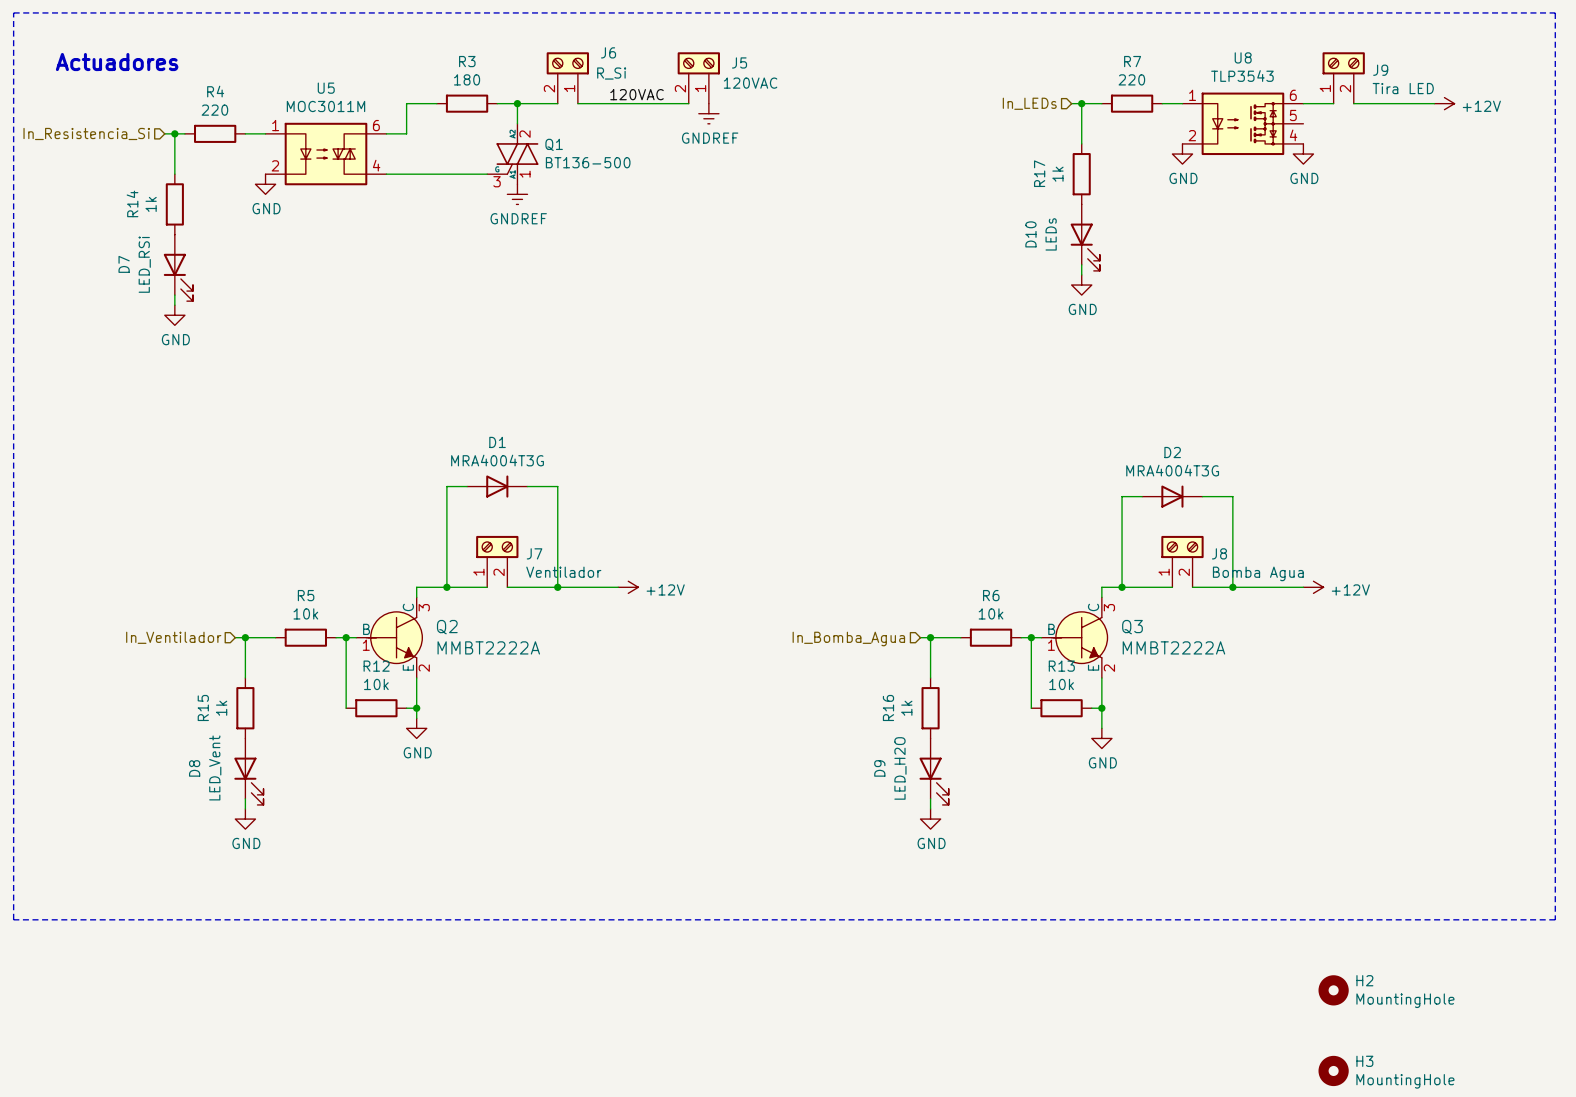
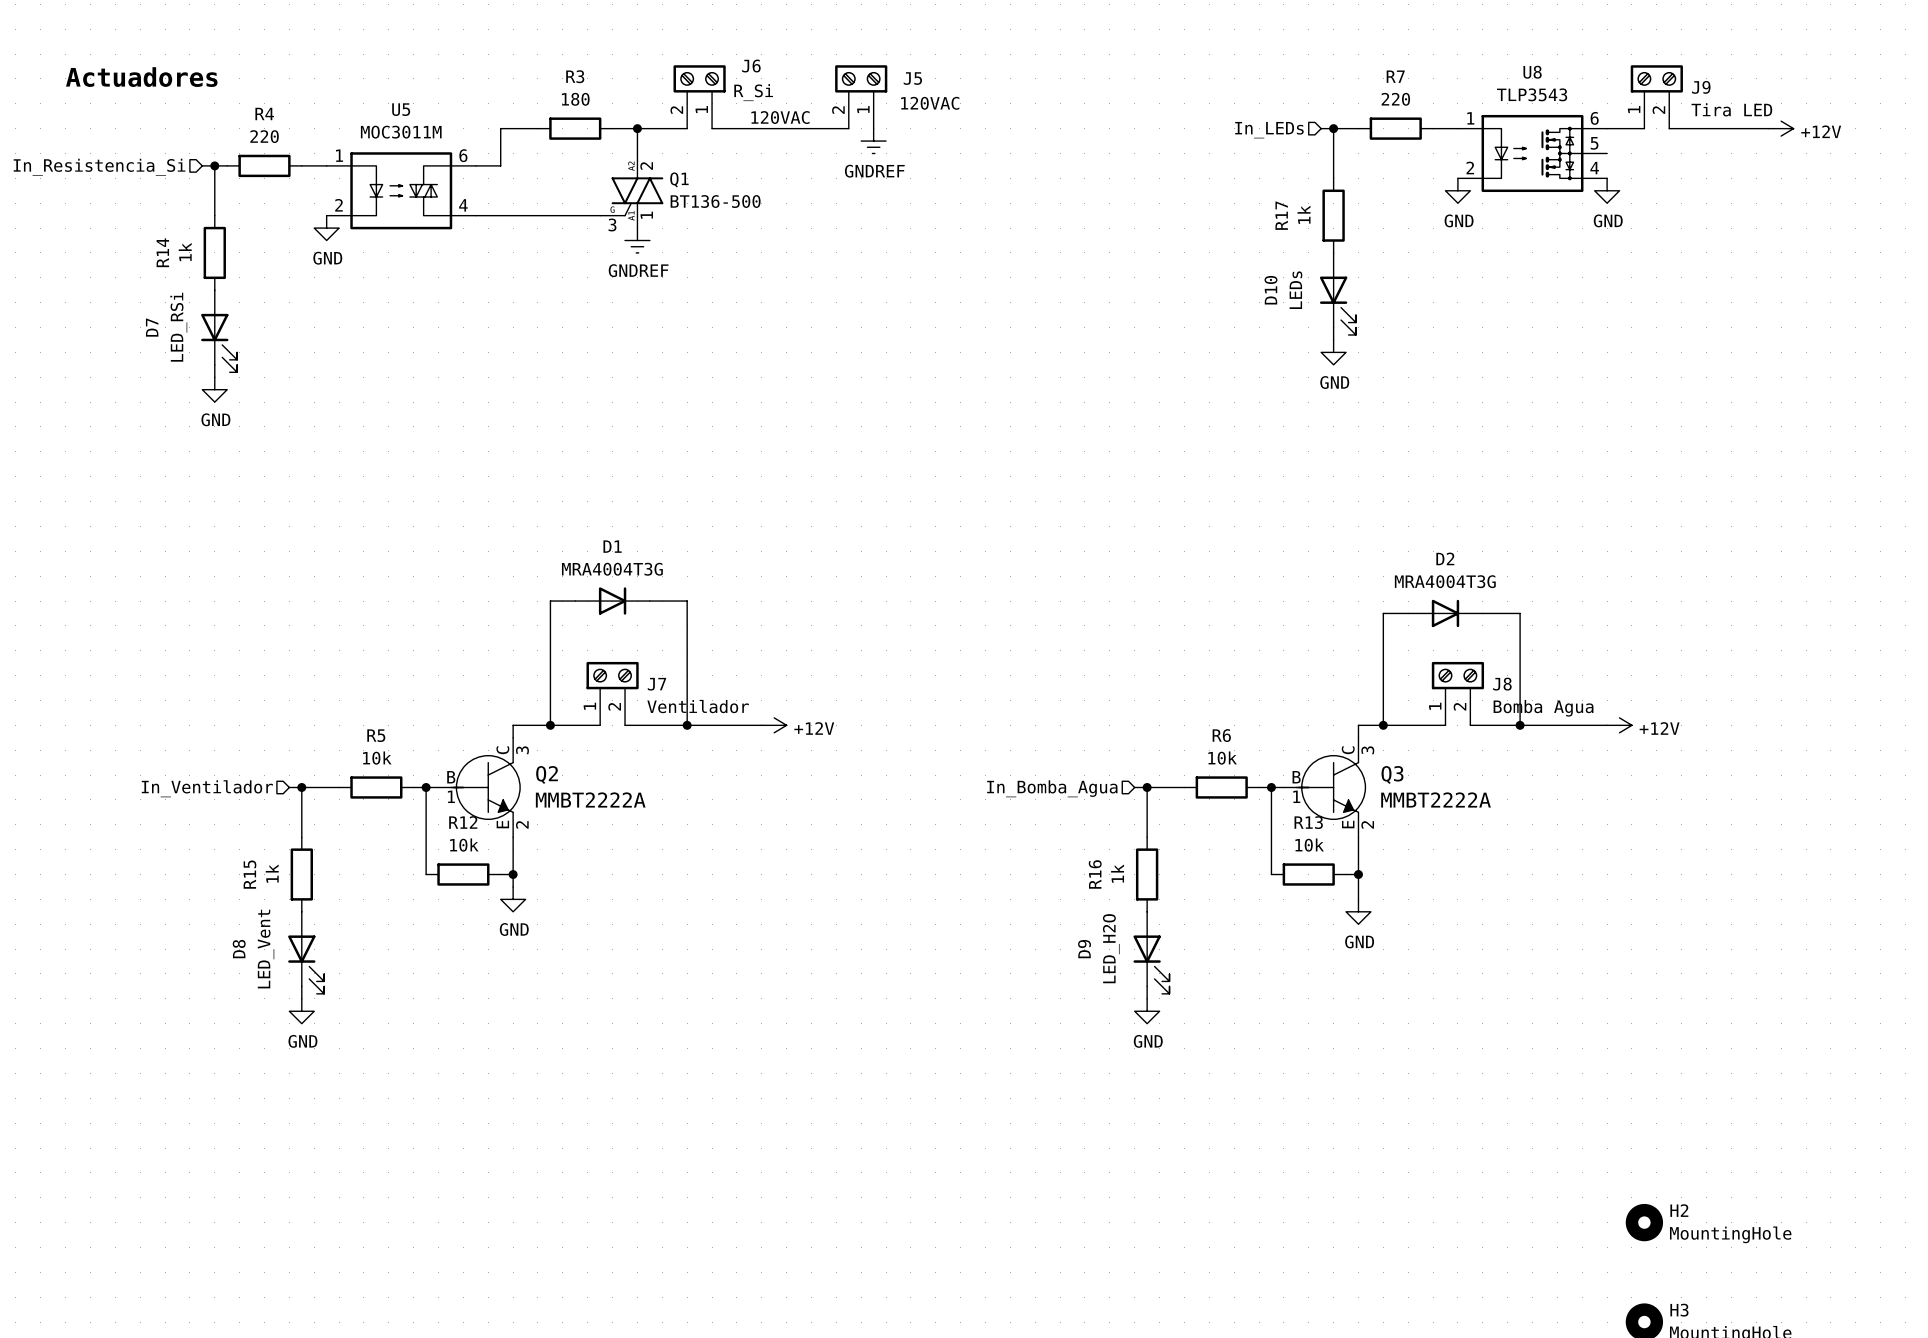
line: (13, 12) (13, 919) (1555, 919) (1555, 12) (13, 12) -> none

